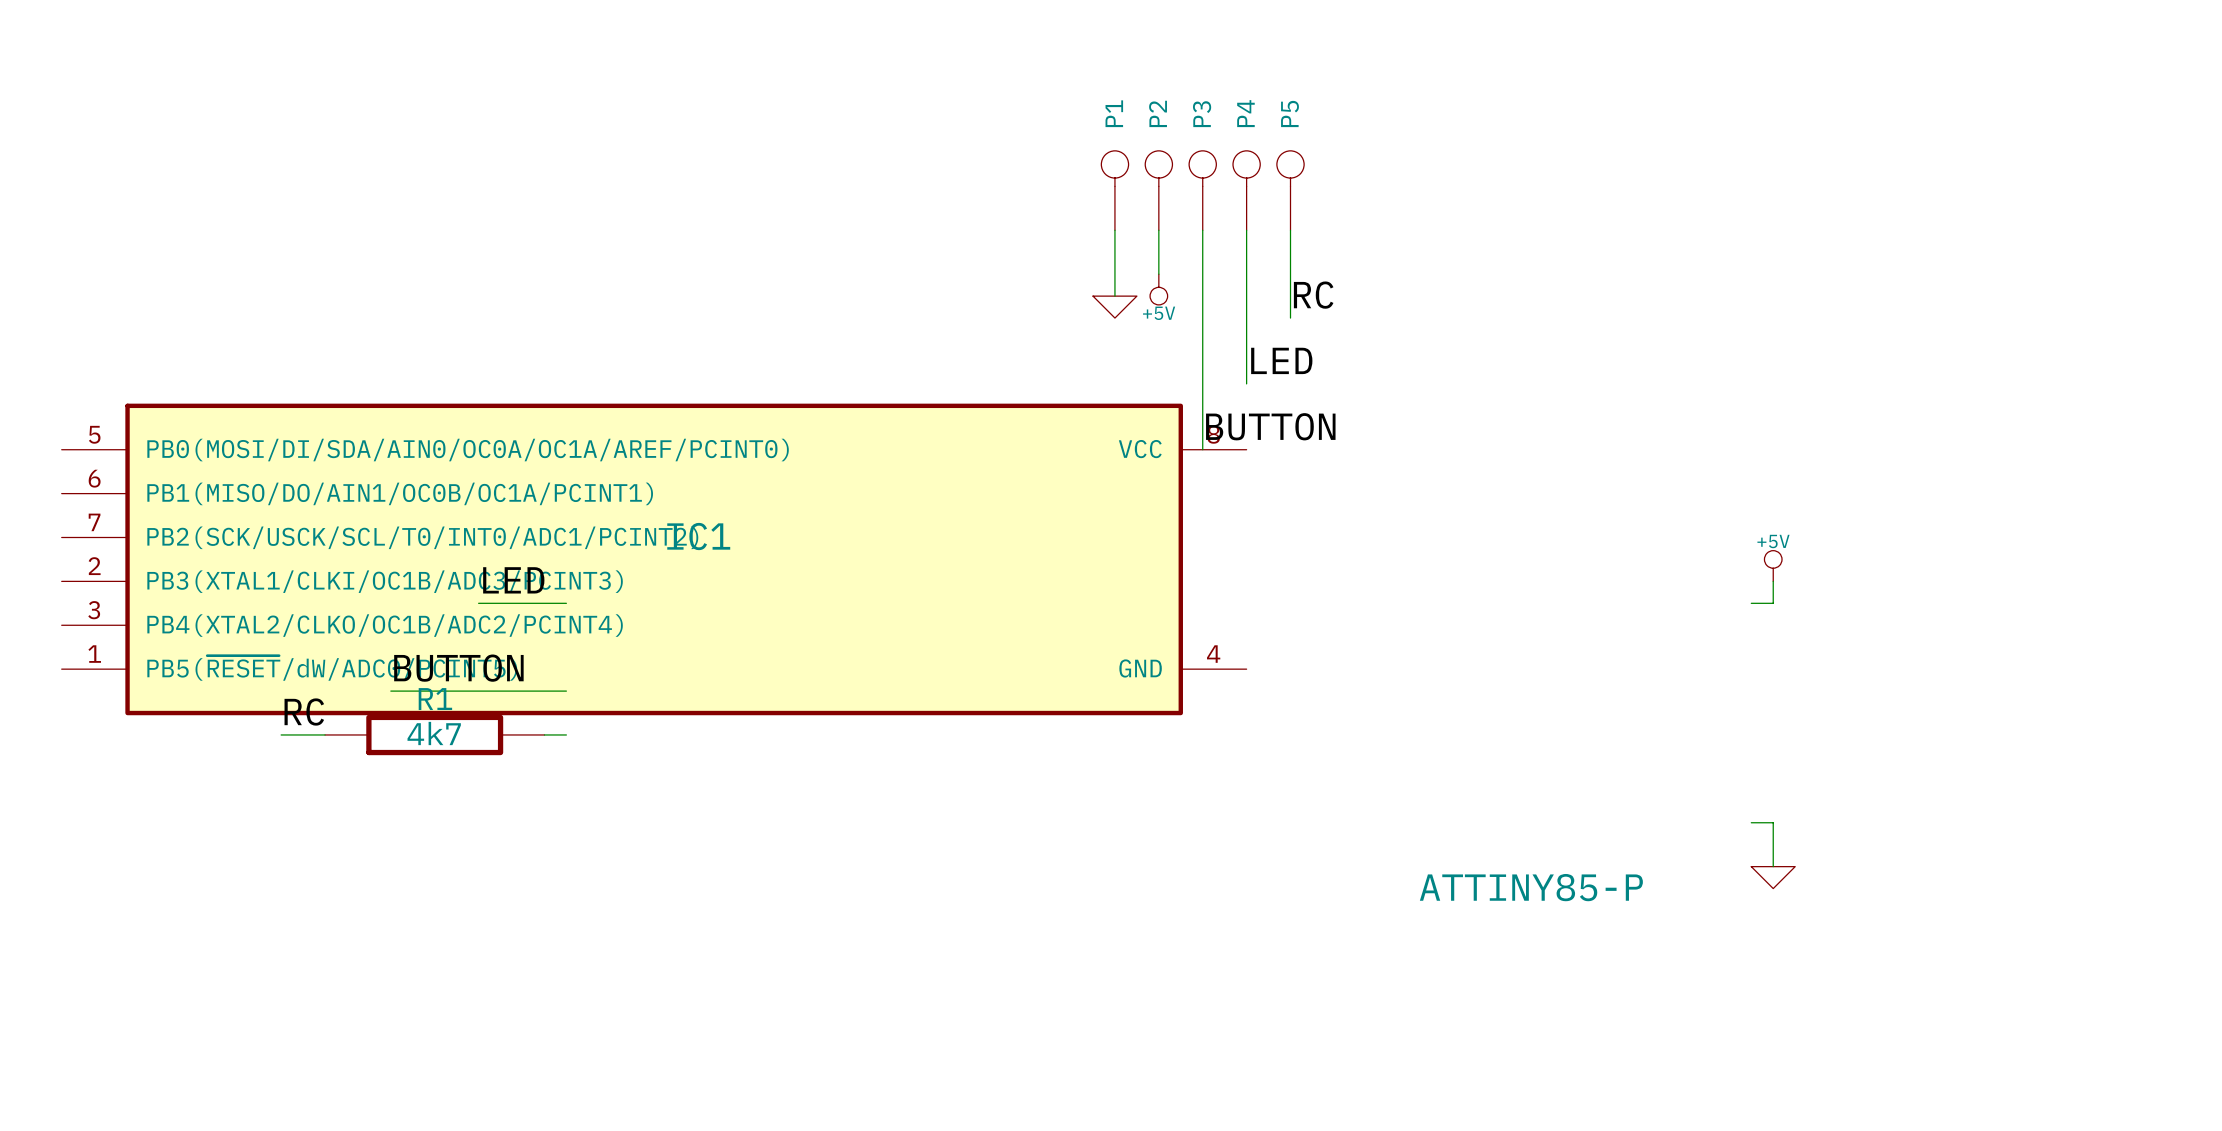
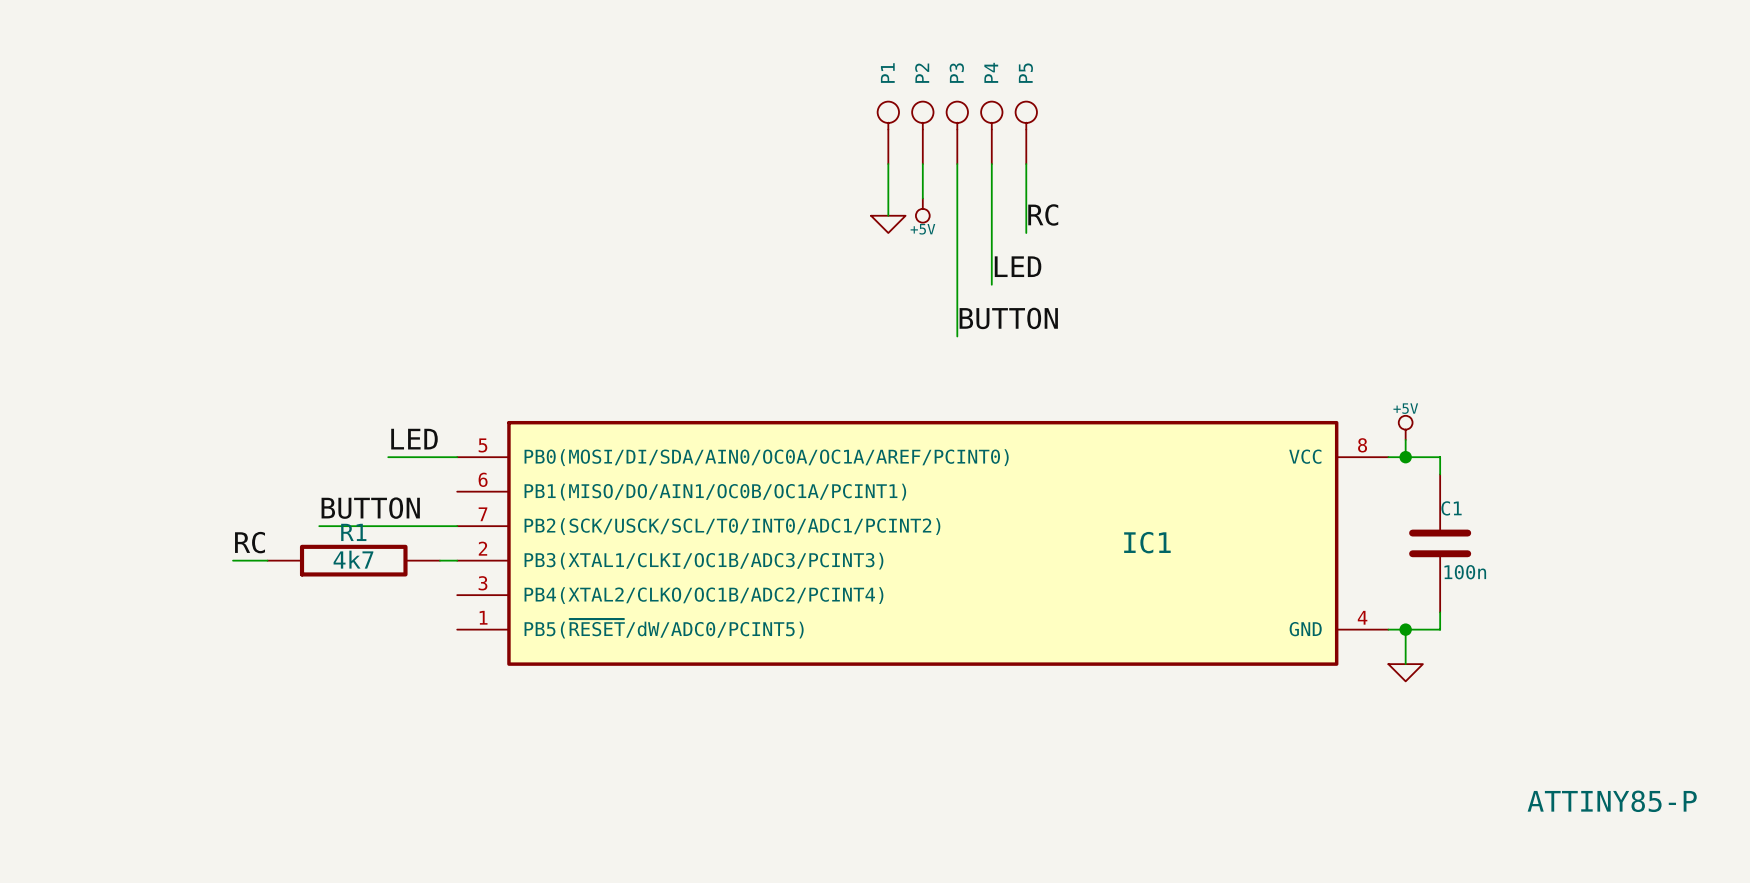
IC1 name position: IC1 (698, 536) -> IC1 (1147, 542)
IC1 position: (654, 559) -> (922, 543)
wire: none -> (1405, 457) (1440, 457) (1440, 474)
junction: none -> (1405, 457)
C1: none -> 100n (1440, 543)
wire: none -> (1440, 612) (1440, 629) (1405, 629)
junction: none -> (1405, 629)

